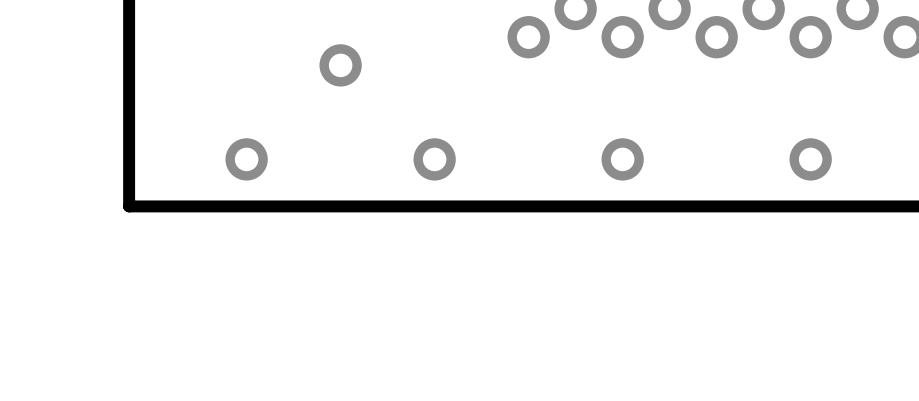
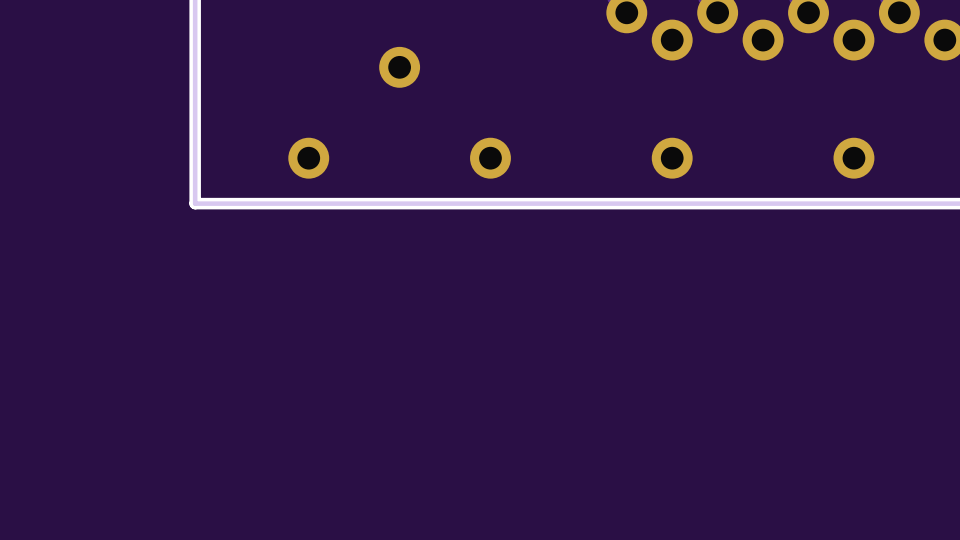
via: (528, 37) -> none

